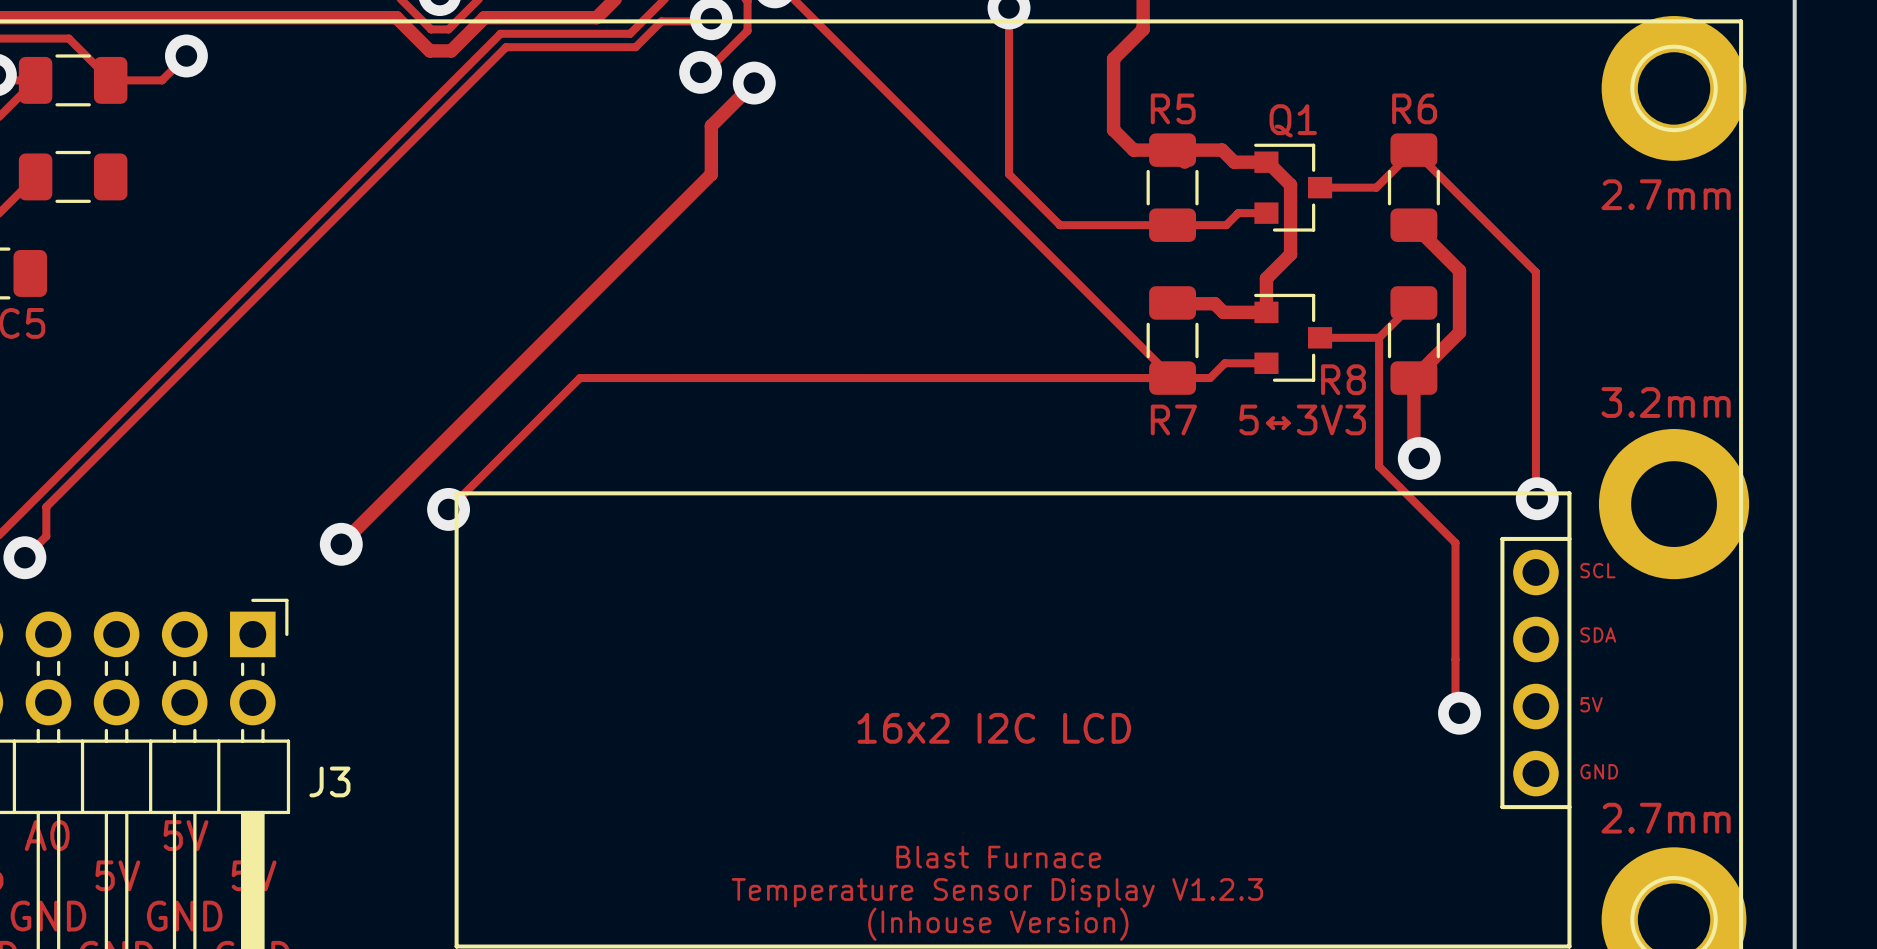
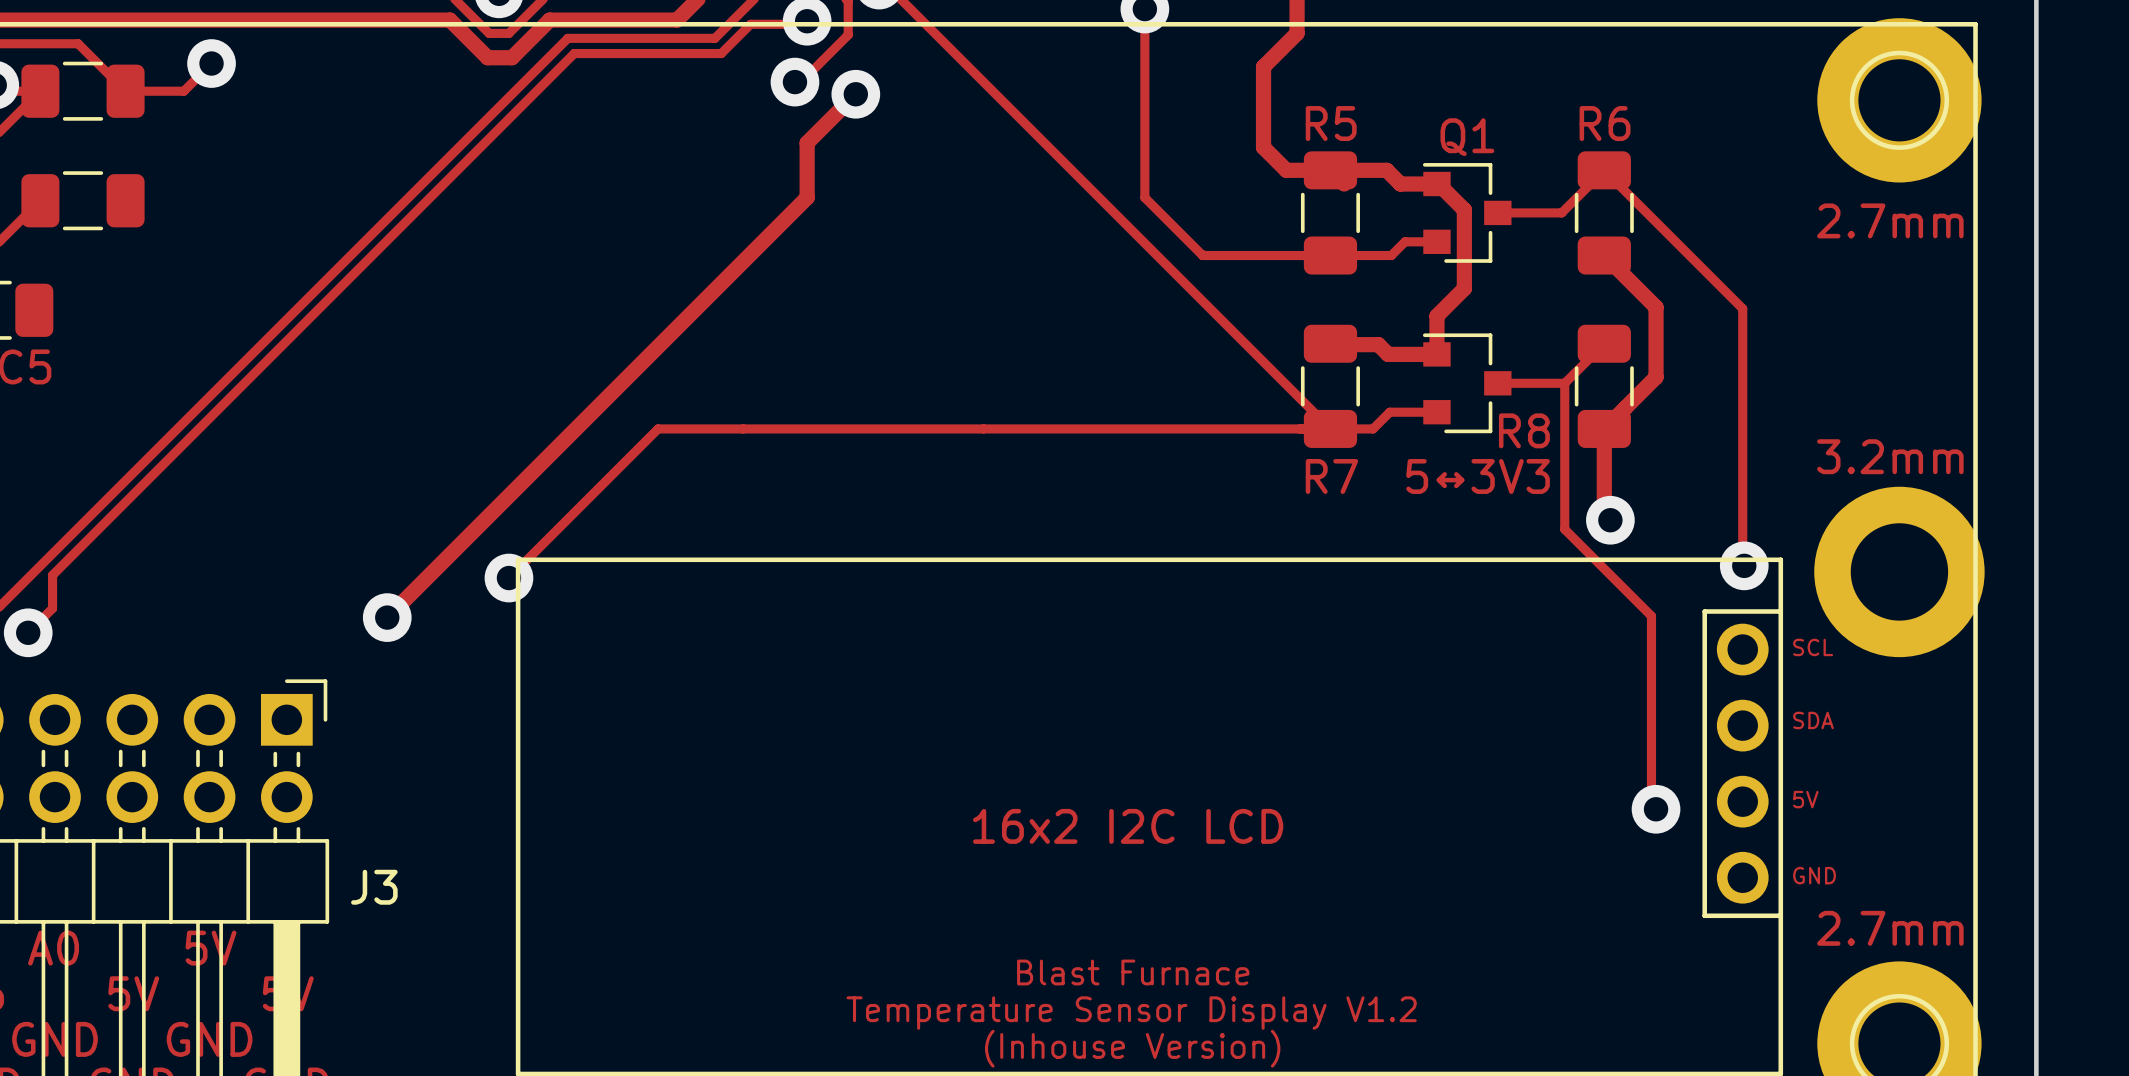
text: Temperature Sensor Display V1.2.3 (997, 892) -> Temperature Sensor Display V1.2 (1131, 1013)

